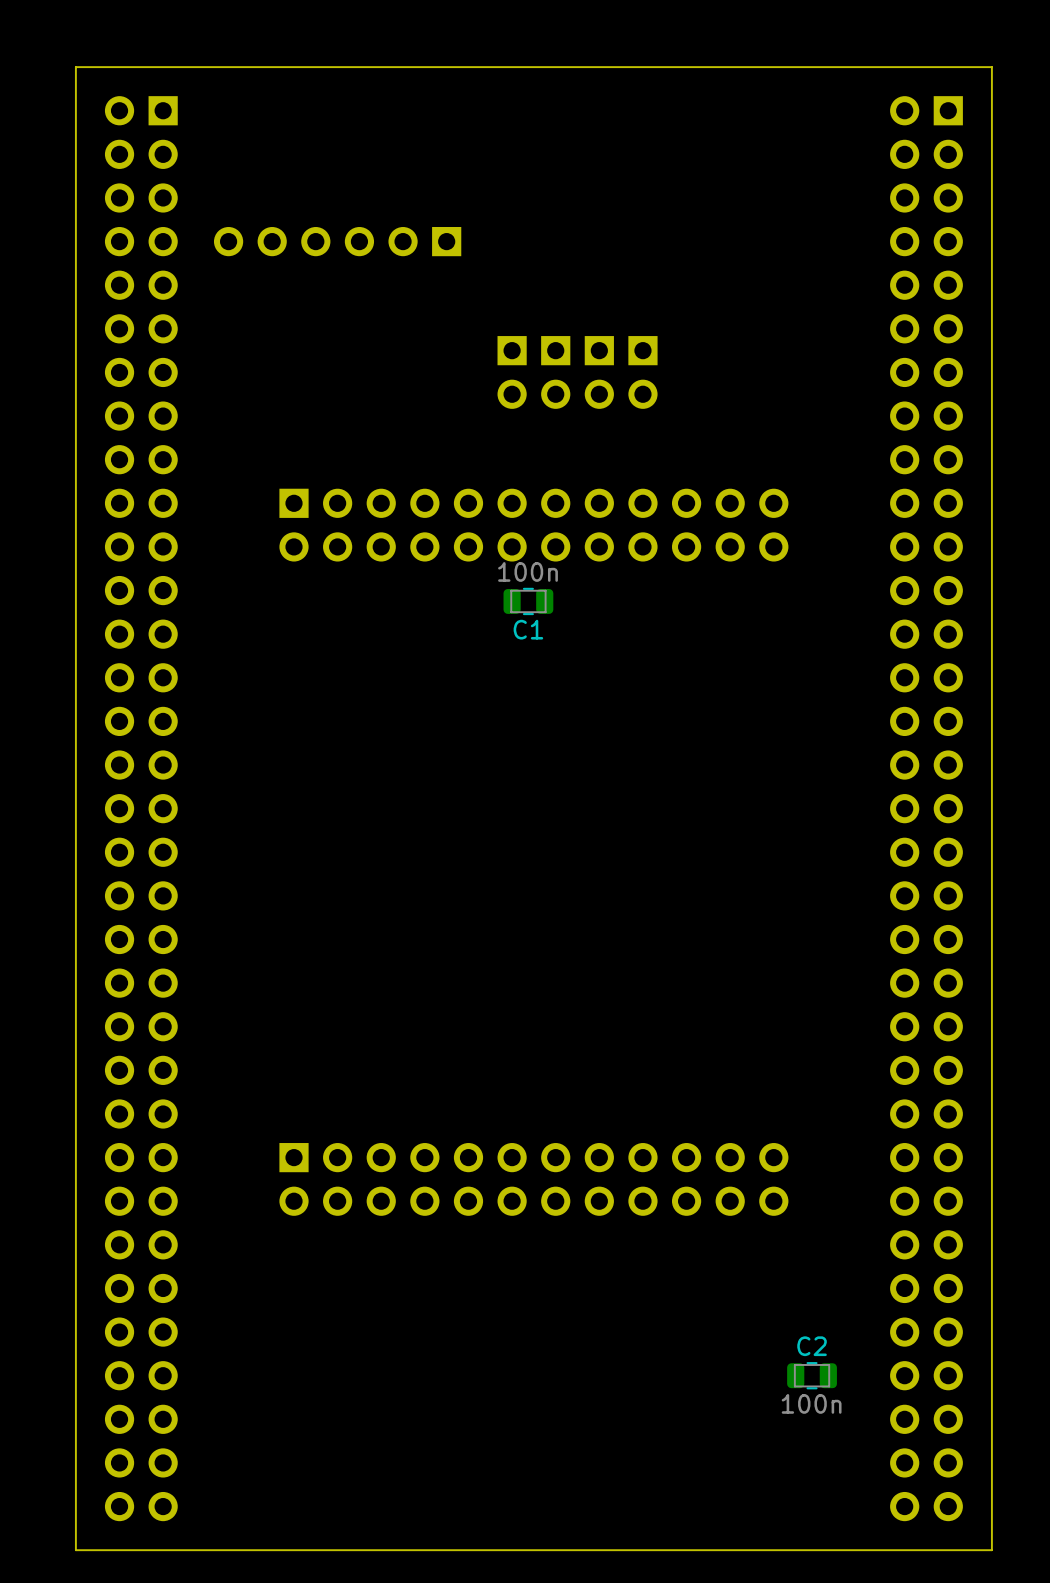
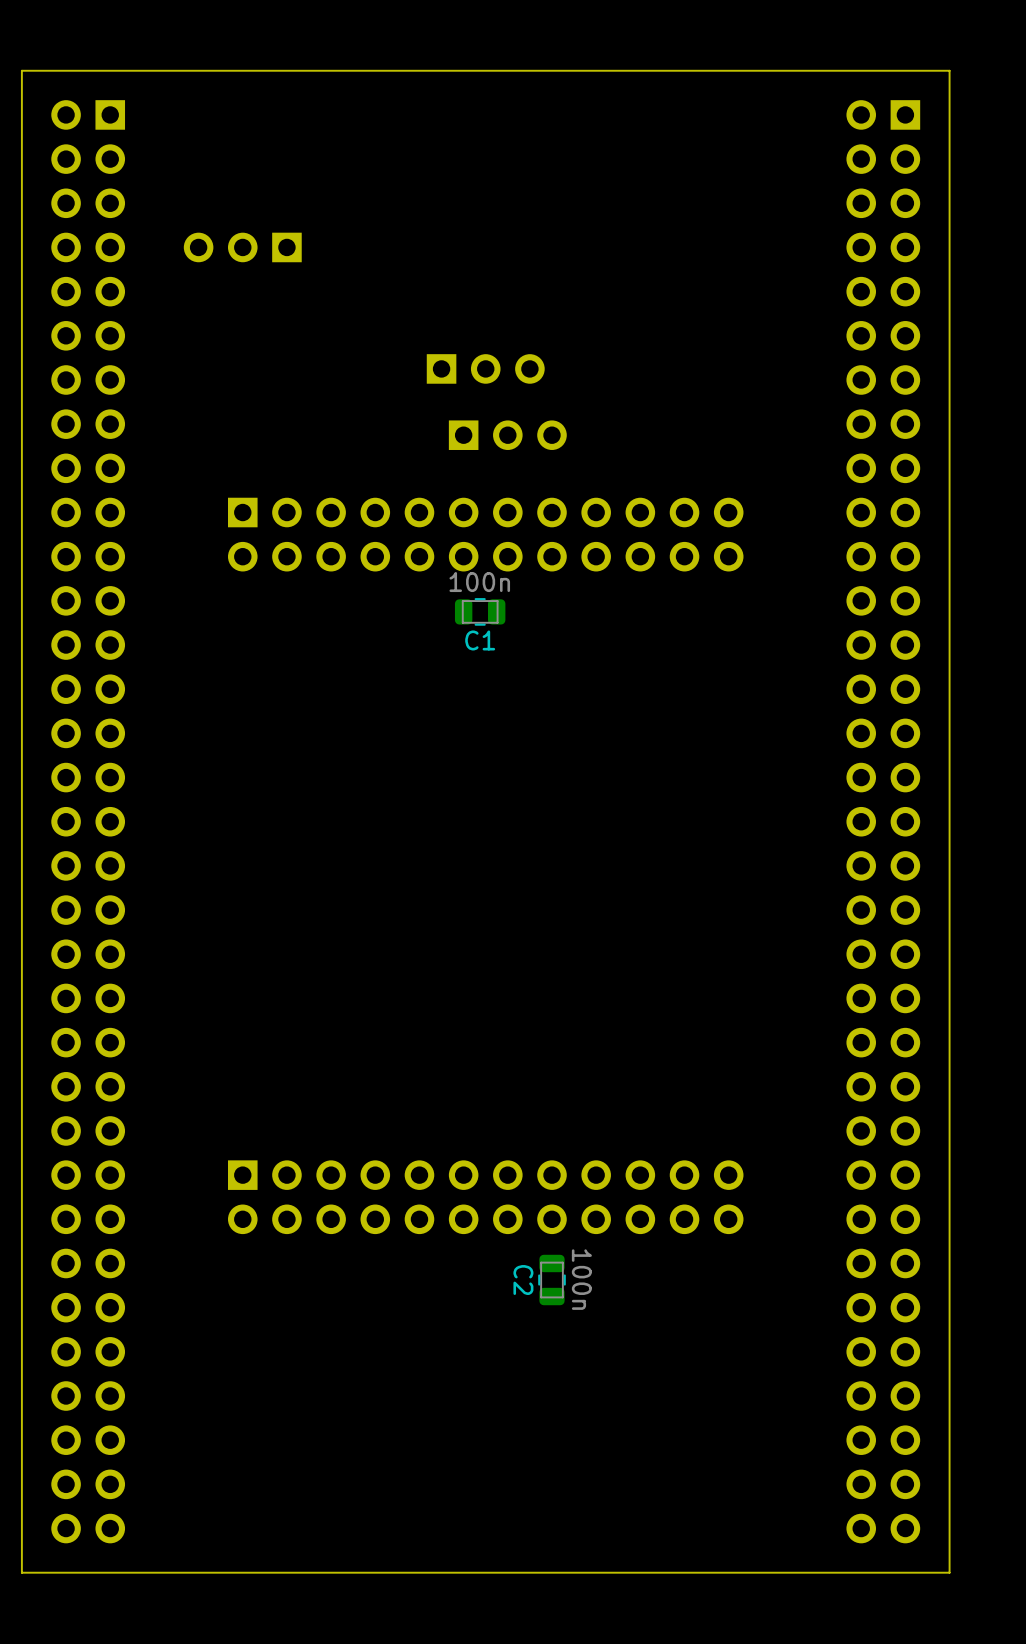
part: none -> (242, 247)
part: (337, 241) -> none
part: none -> (485, 368)
part: (512, 372) -> none
part: (555, 372) -> none
part: (599, 372) -> none
part: (642, 372) -> none
part: none -> (507, 435)
C2 name position: C2 (812, 1346) -> C2 (523, 1280)
C2 rotation: 0° (812, 1375) -> 90° clockwise (552, 1280)
C2 position: (812, 1375) -> (552, 1280)
C2 value position: 100n (811, 1403) -> 100n (581, 1279)

